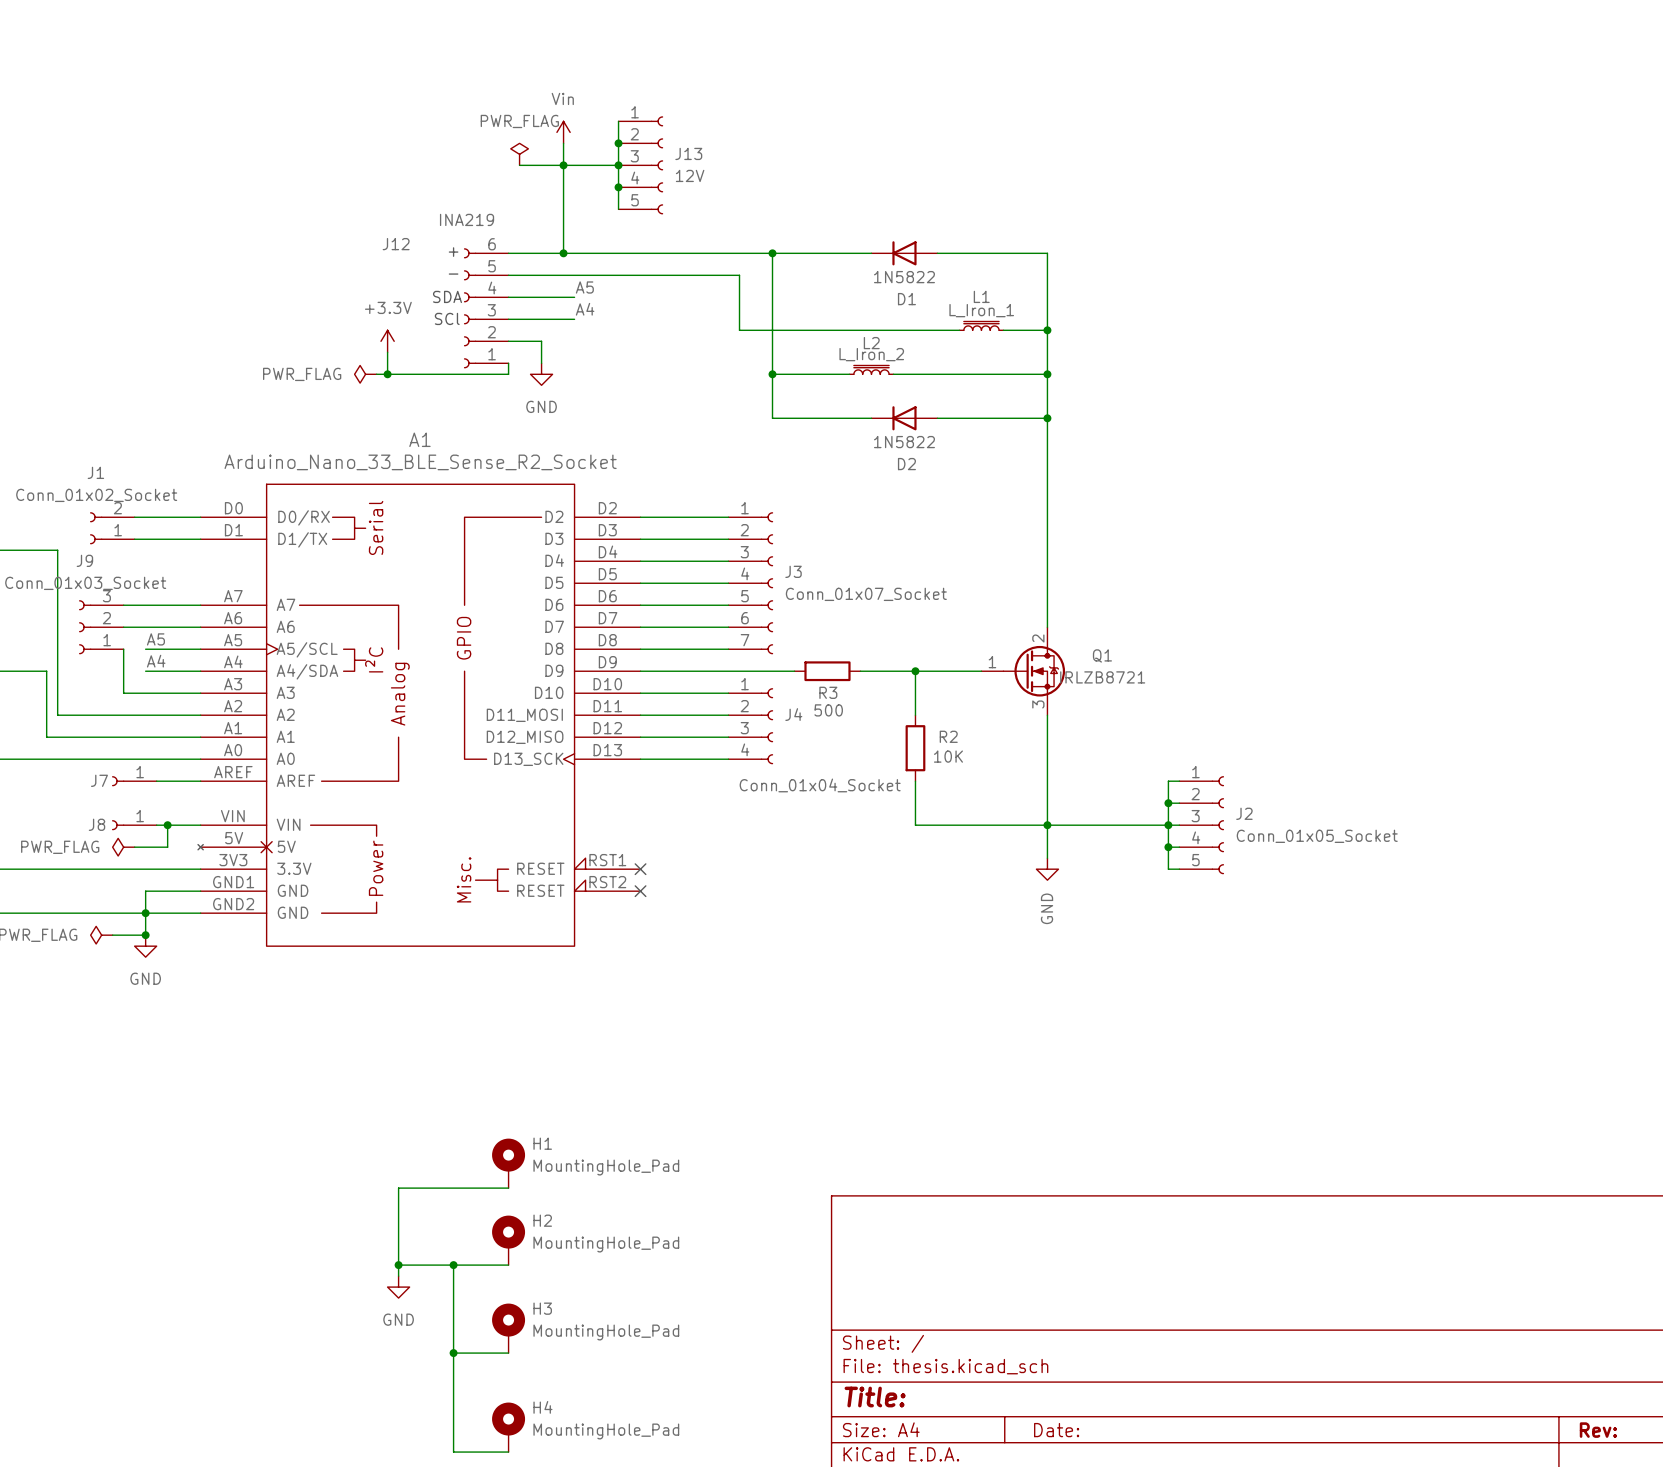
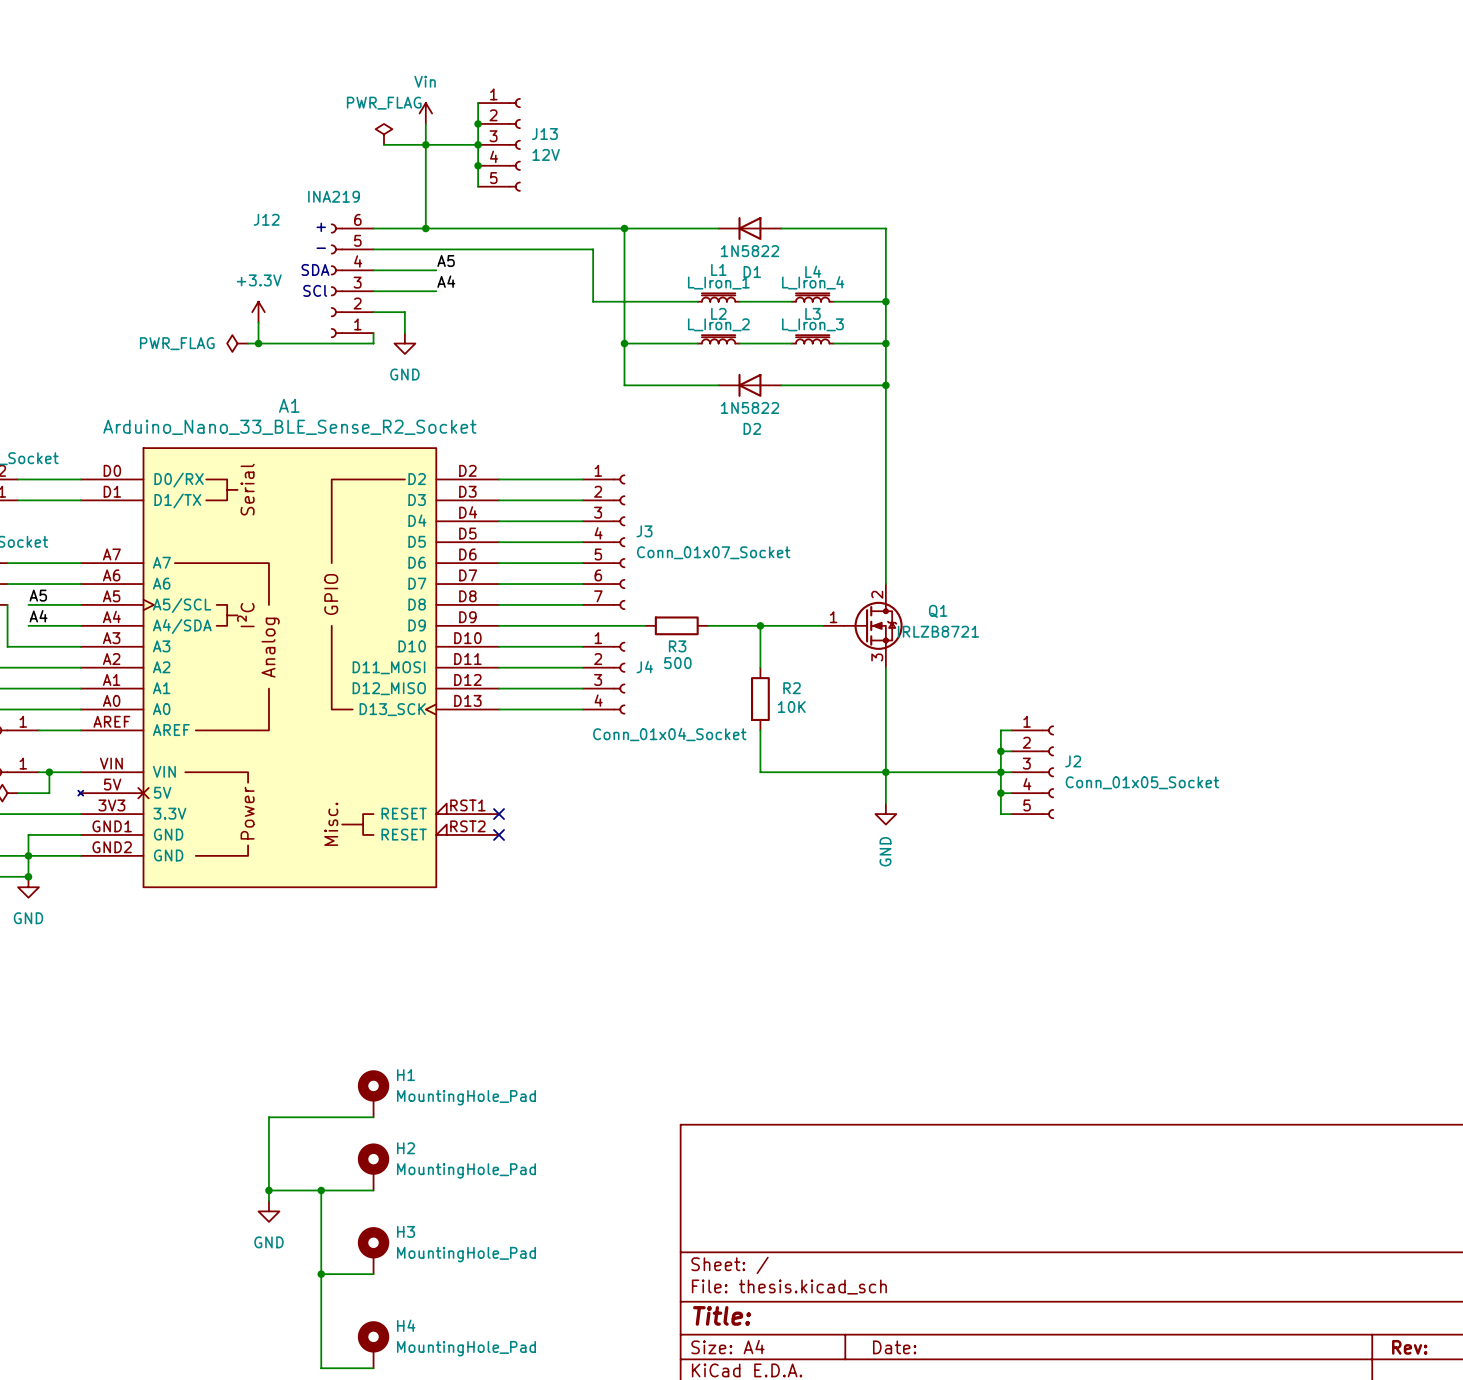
L4: none -> L_Iron_4 (812, 297)
L1 position: (981, 325) -> (718, 297)
wire: (849, 330) (893, 330) -> none
wire: (948, 330) (959, 330) -> (833, 301) (844, 301)
L3: none -> L_Iron_3 (812, 339)
wire: (948, 374) (992, 374) -> none

